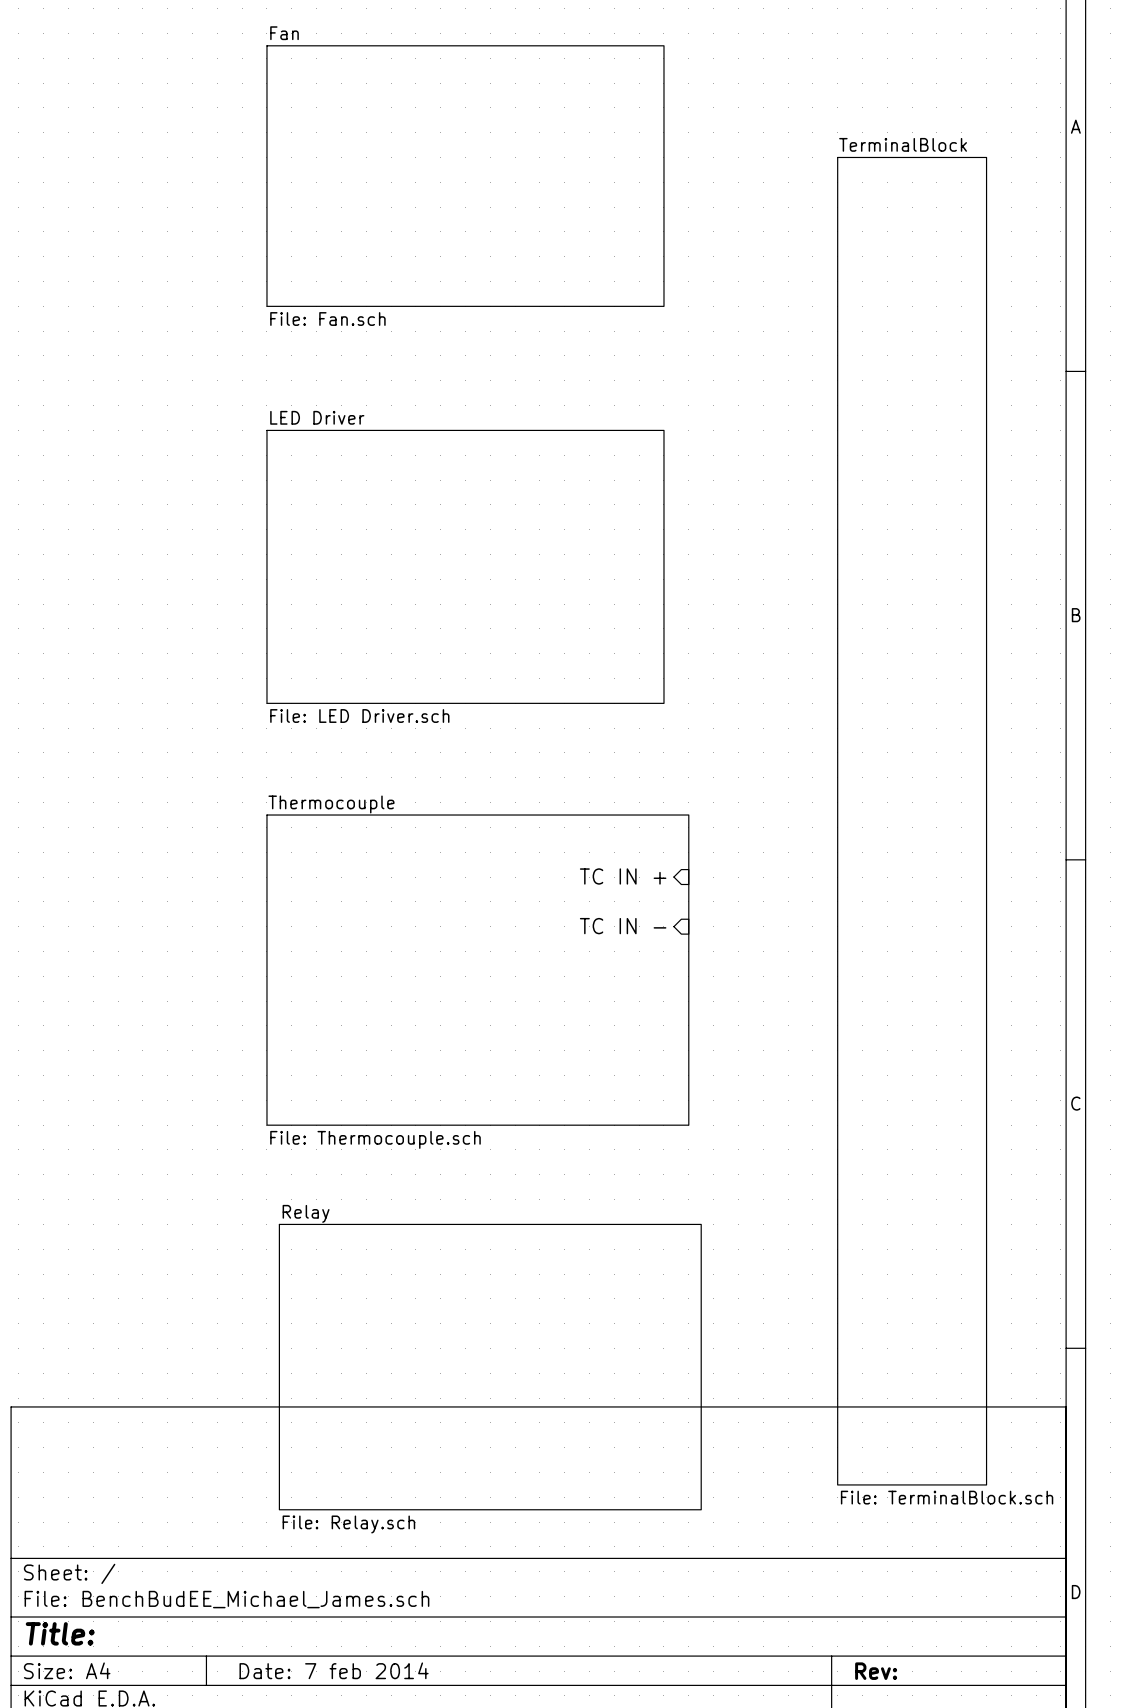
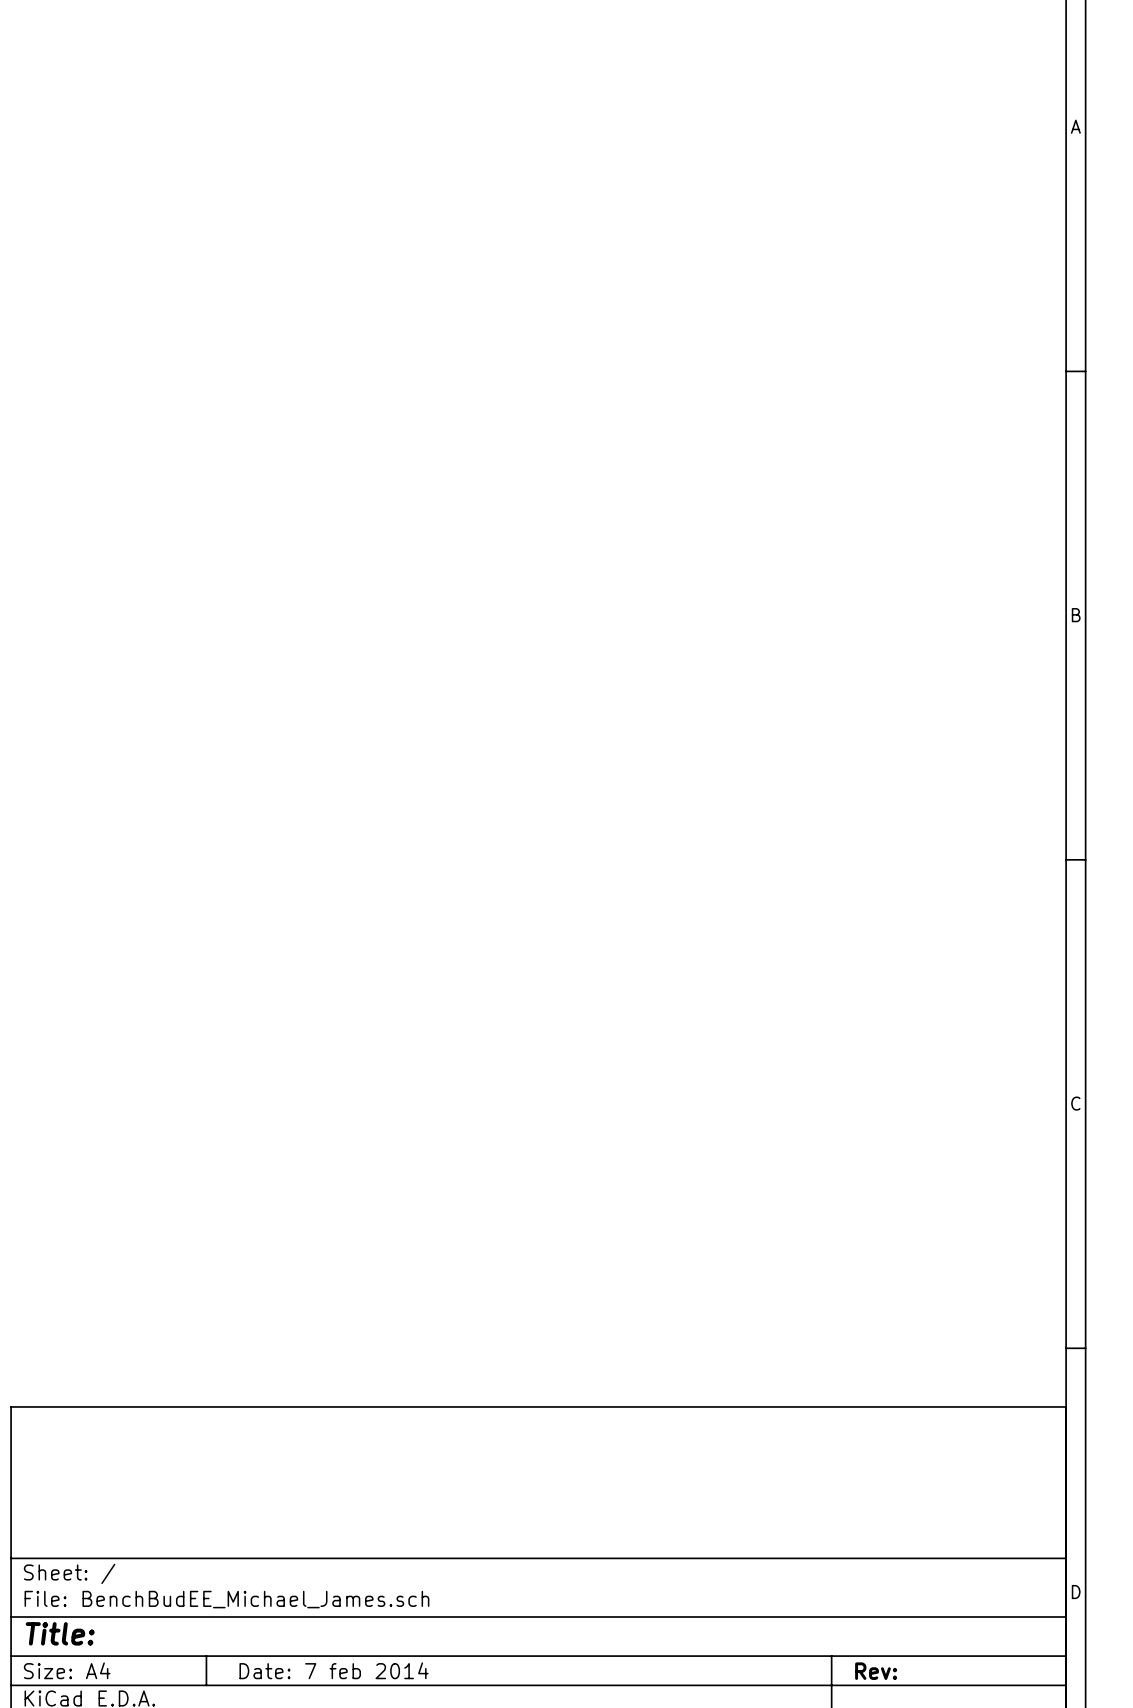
sheet Fan: File: Fan.sch (465, 176) -> none
sheet LED Driver: File: LED Driver.sch (465, 566) -> none
sheet TerminalBlock: File: TerminalBlock.sch (912, 821) -> none
sheet pin: TC IN + (623, 876) -> none
sheet pin: TC IN - (623, 926) -> none
sheet Thermocouple: File: Thermocouple.sch (477, 970) -> none
sheet Relay: File: Relay.sch (490, 1367) -> none

